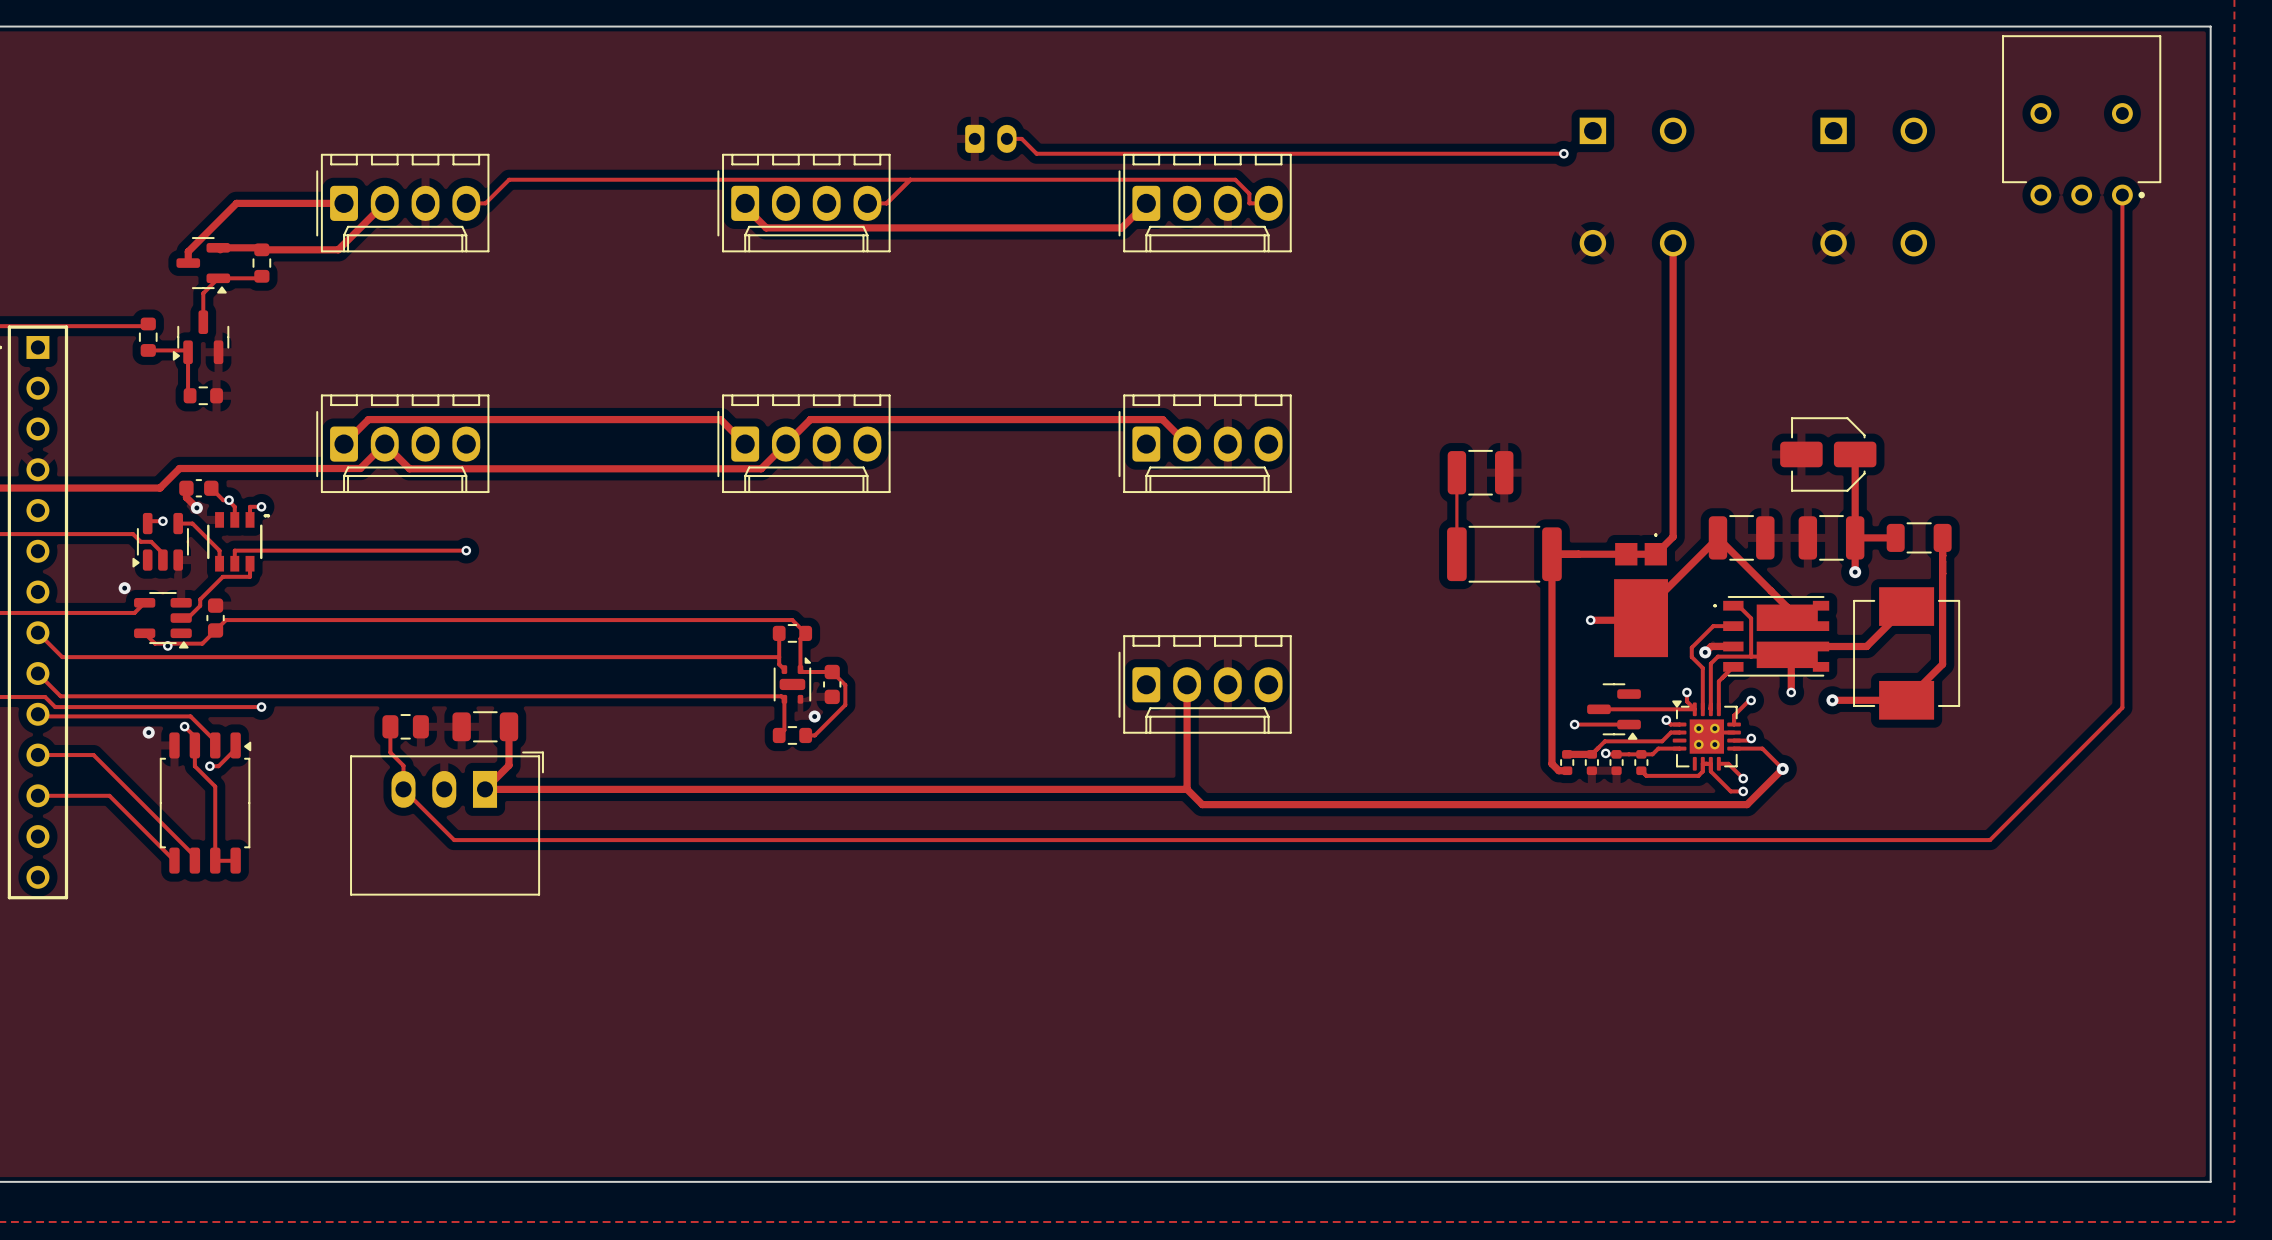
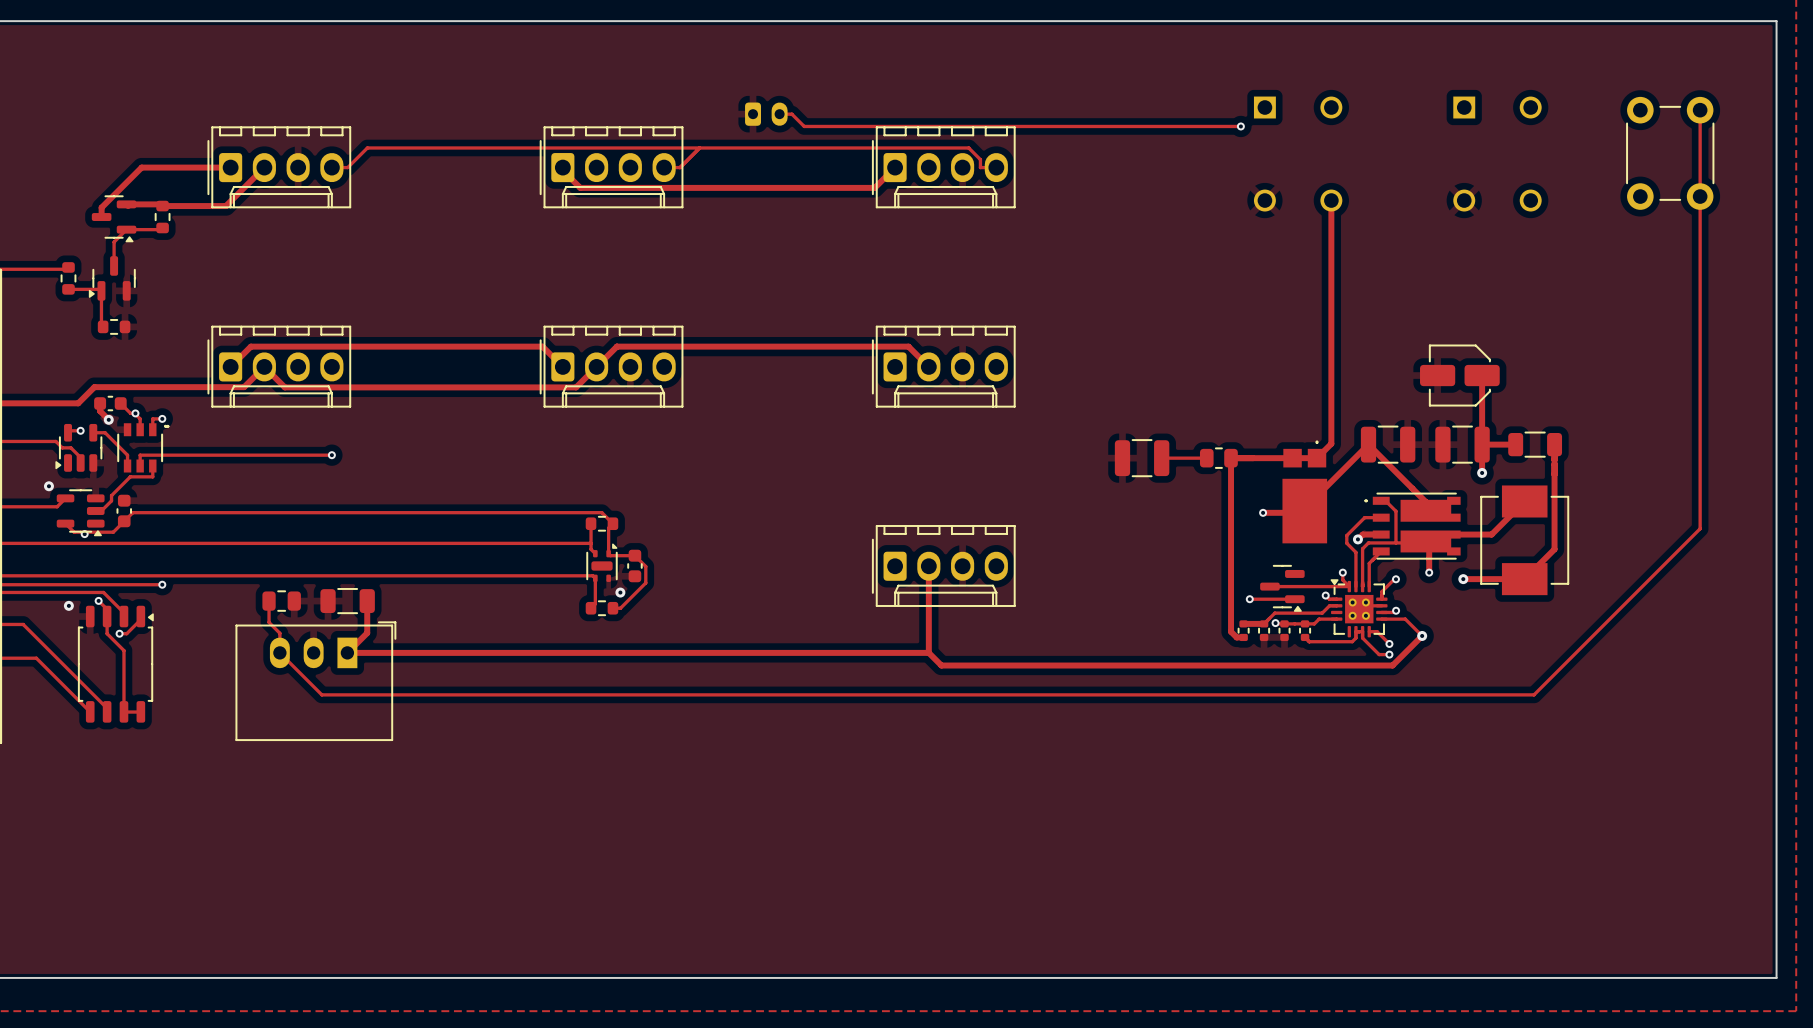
part: (2081, 120) -> none
part: none -> (1670, 153)
track: (2122, 195) (2122, 707) (1990, 840) (1917, 840) -> (1700, 110) (1700, 528) (1534, 694)
track: (1456, 472) (1456, 554) -> none
part position: (1480, 472) -> (1142, 458)
track: none -> (1161, 458) (1206, 458)
part: (1504, 554) -> none
part: none -> (1218, 458)

